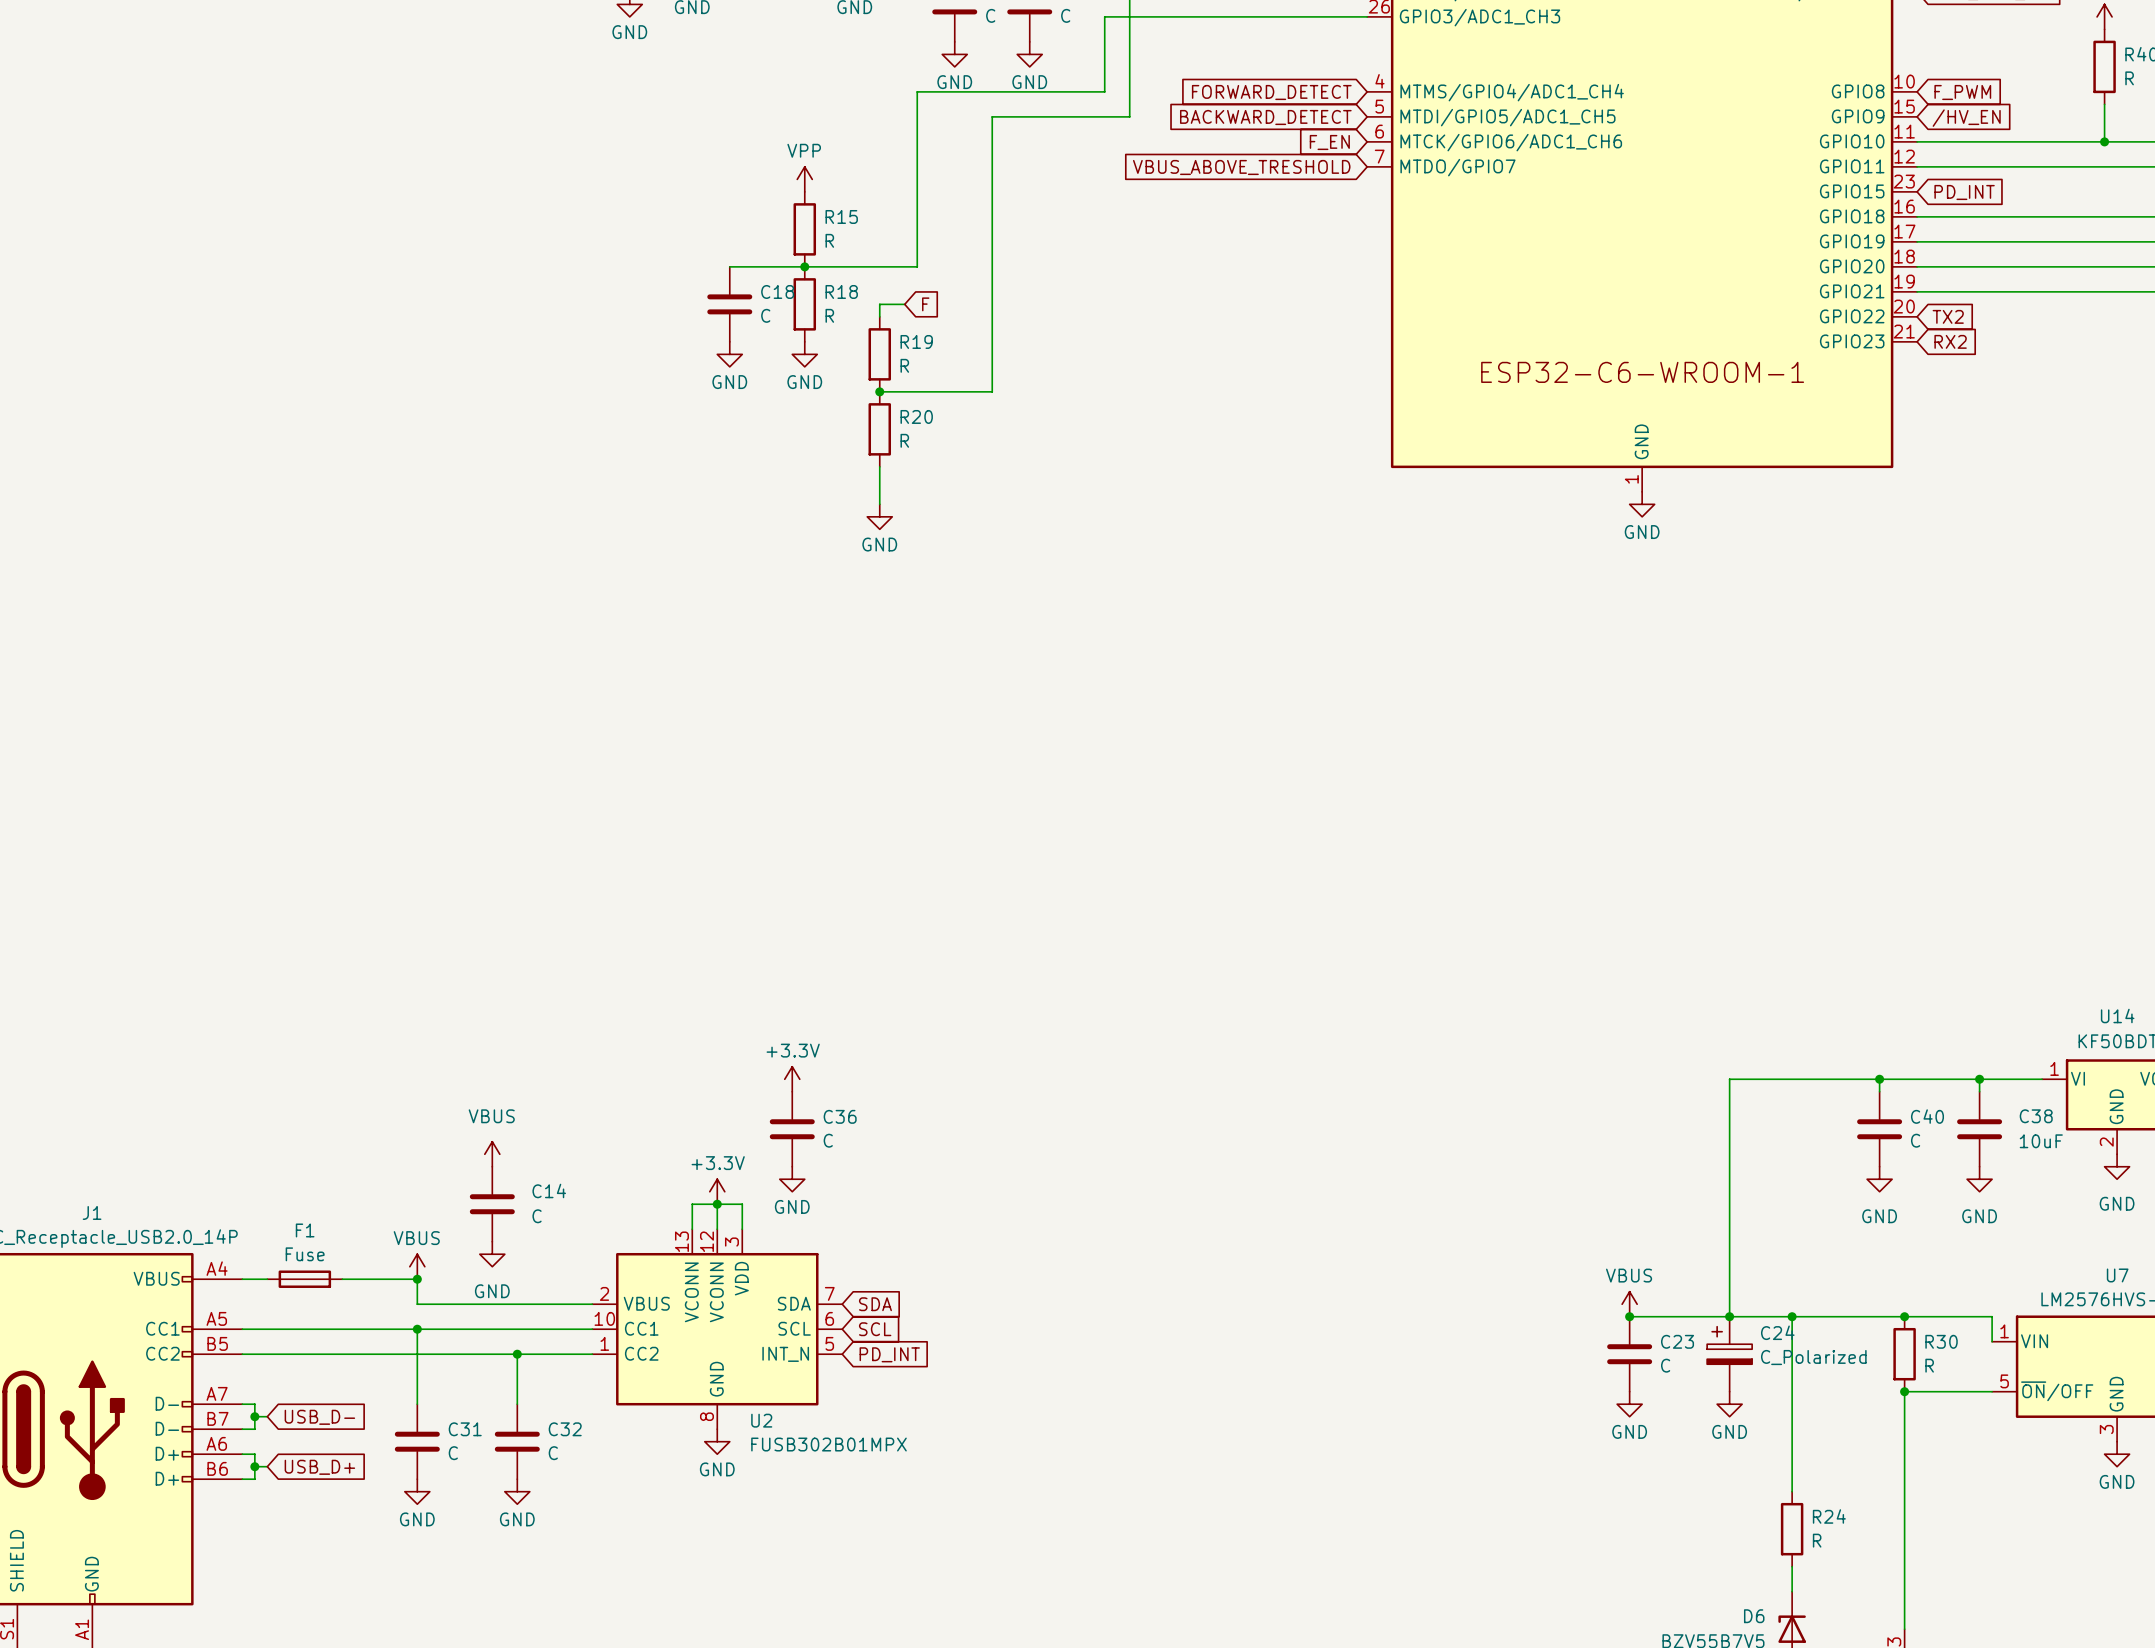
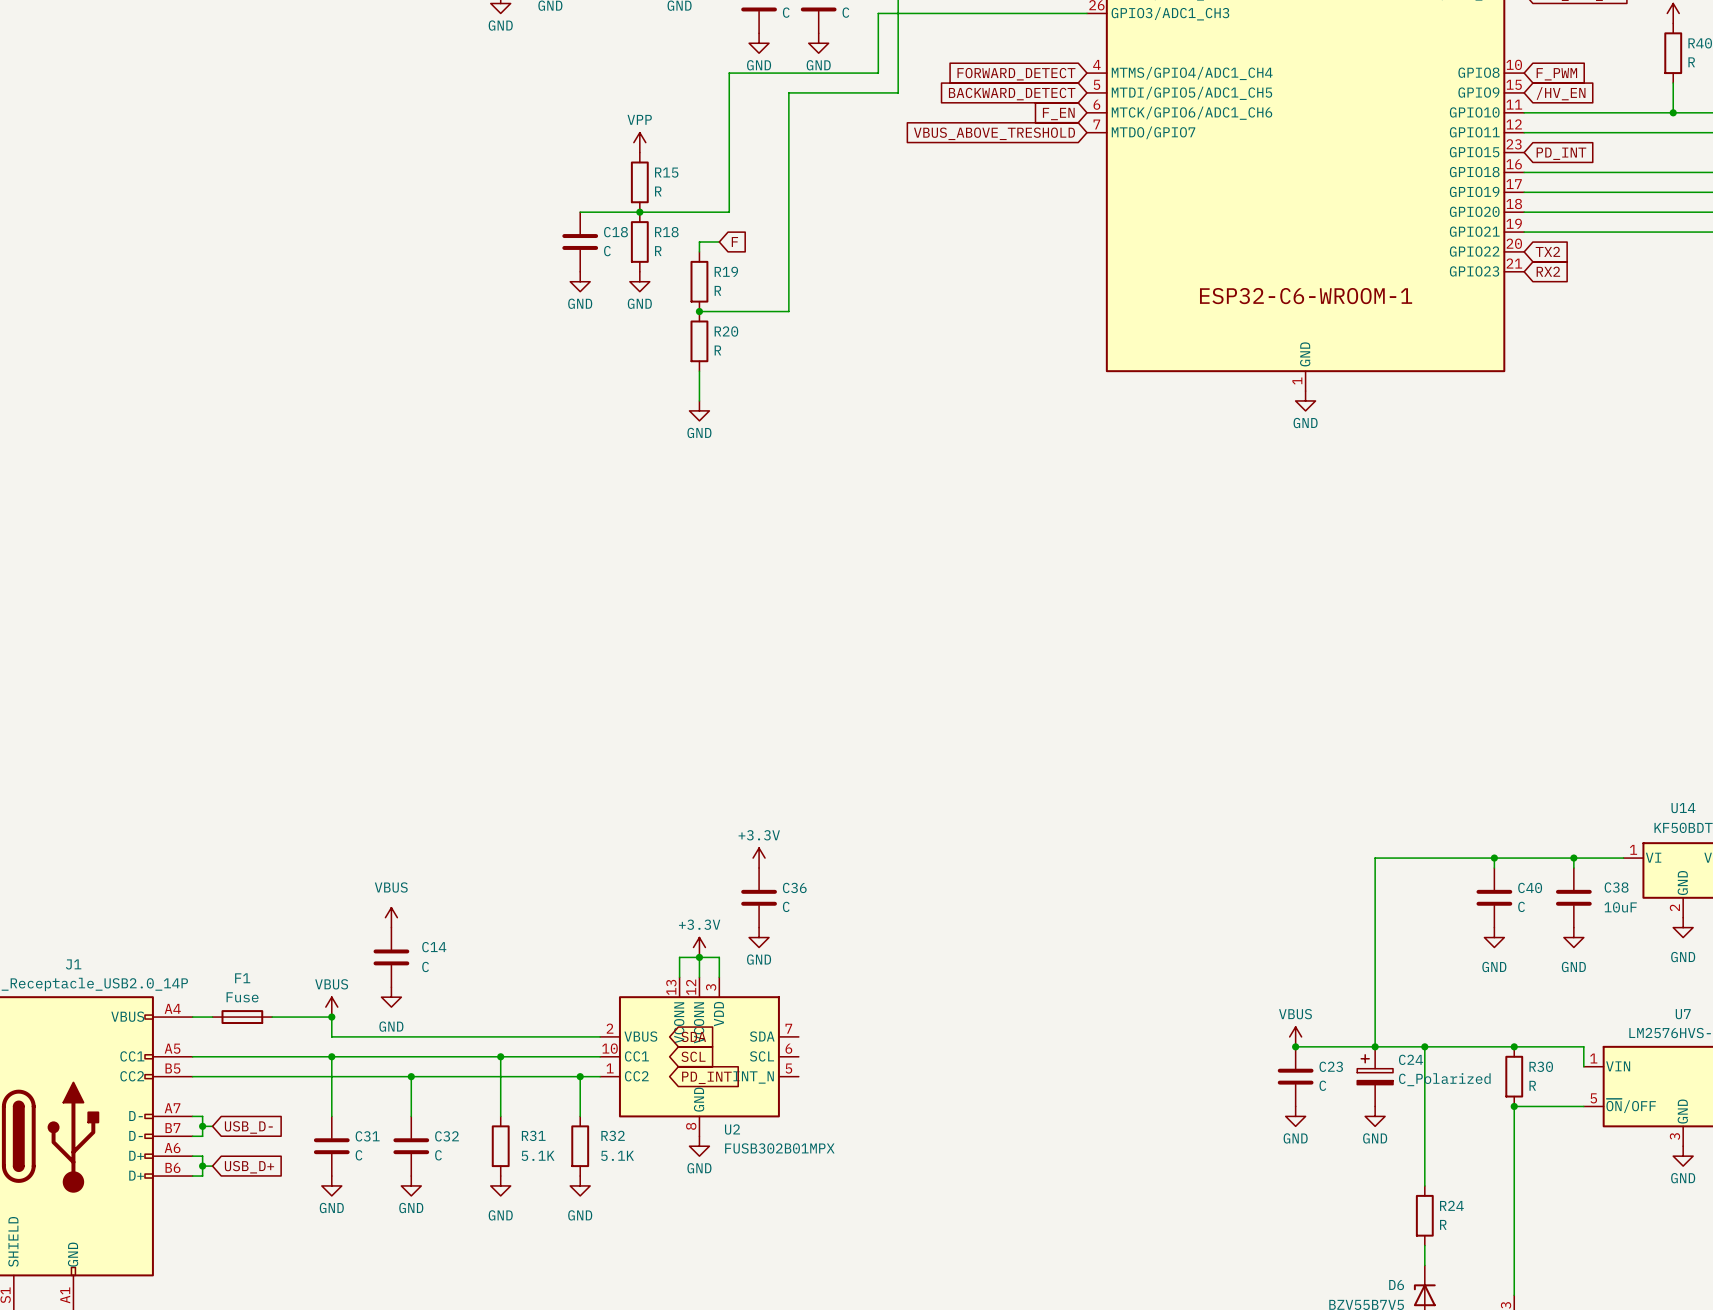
power symbol: +3.3V (792, 1079) -> none
power symbol: none -> +3.3V (759, 858)
C36 position: (792, 1129) -> (759, 897)
power symbol: GND (792, 1179) -> none
power symbol: none -> GND (759, 937)
power symbol: +3.3V (717, 1191) -> none
power symbol: none -> +3.3V (699, 947)
wire: (717, 1204) (717, 1229) -> (699, 957) (699, 977)
junction: (717, 1204) -> none
junction: none -> (699, 957)
wire: (692, 1229) (692, 1204) (742, 1204) (742, 1229) -> (679, 977) (679, 957) (719, 957) (719, 977)
junction: none -> (500, 1056)
U2 position: (717, 1329) -> (699, 1056)
junction: none -> (580, 1076)
R31: none -> 5.1K (500, 1146)
power symbol: GND (717, 1441) -> none
R32: none -> 5.1K (580, 1146)
power symbol: none -> GND (699, 1146)
power symbol: none -> GND (500, 1185)
power symbol: none -> GND (580, 1185)

